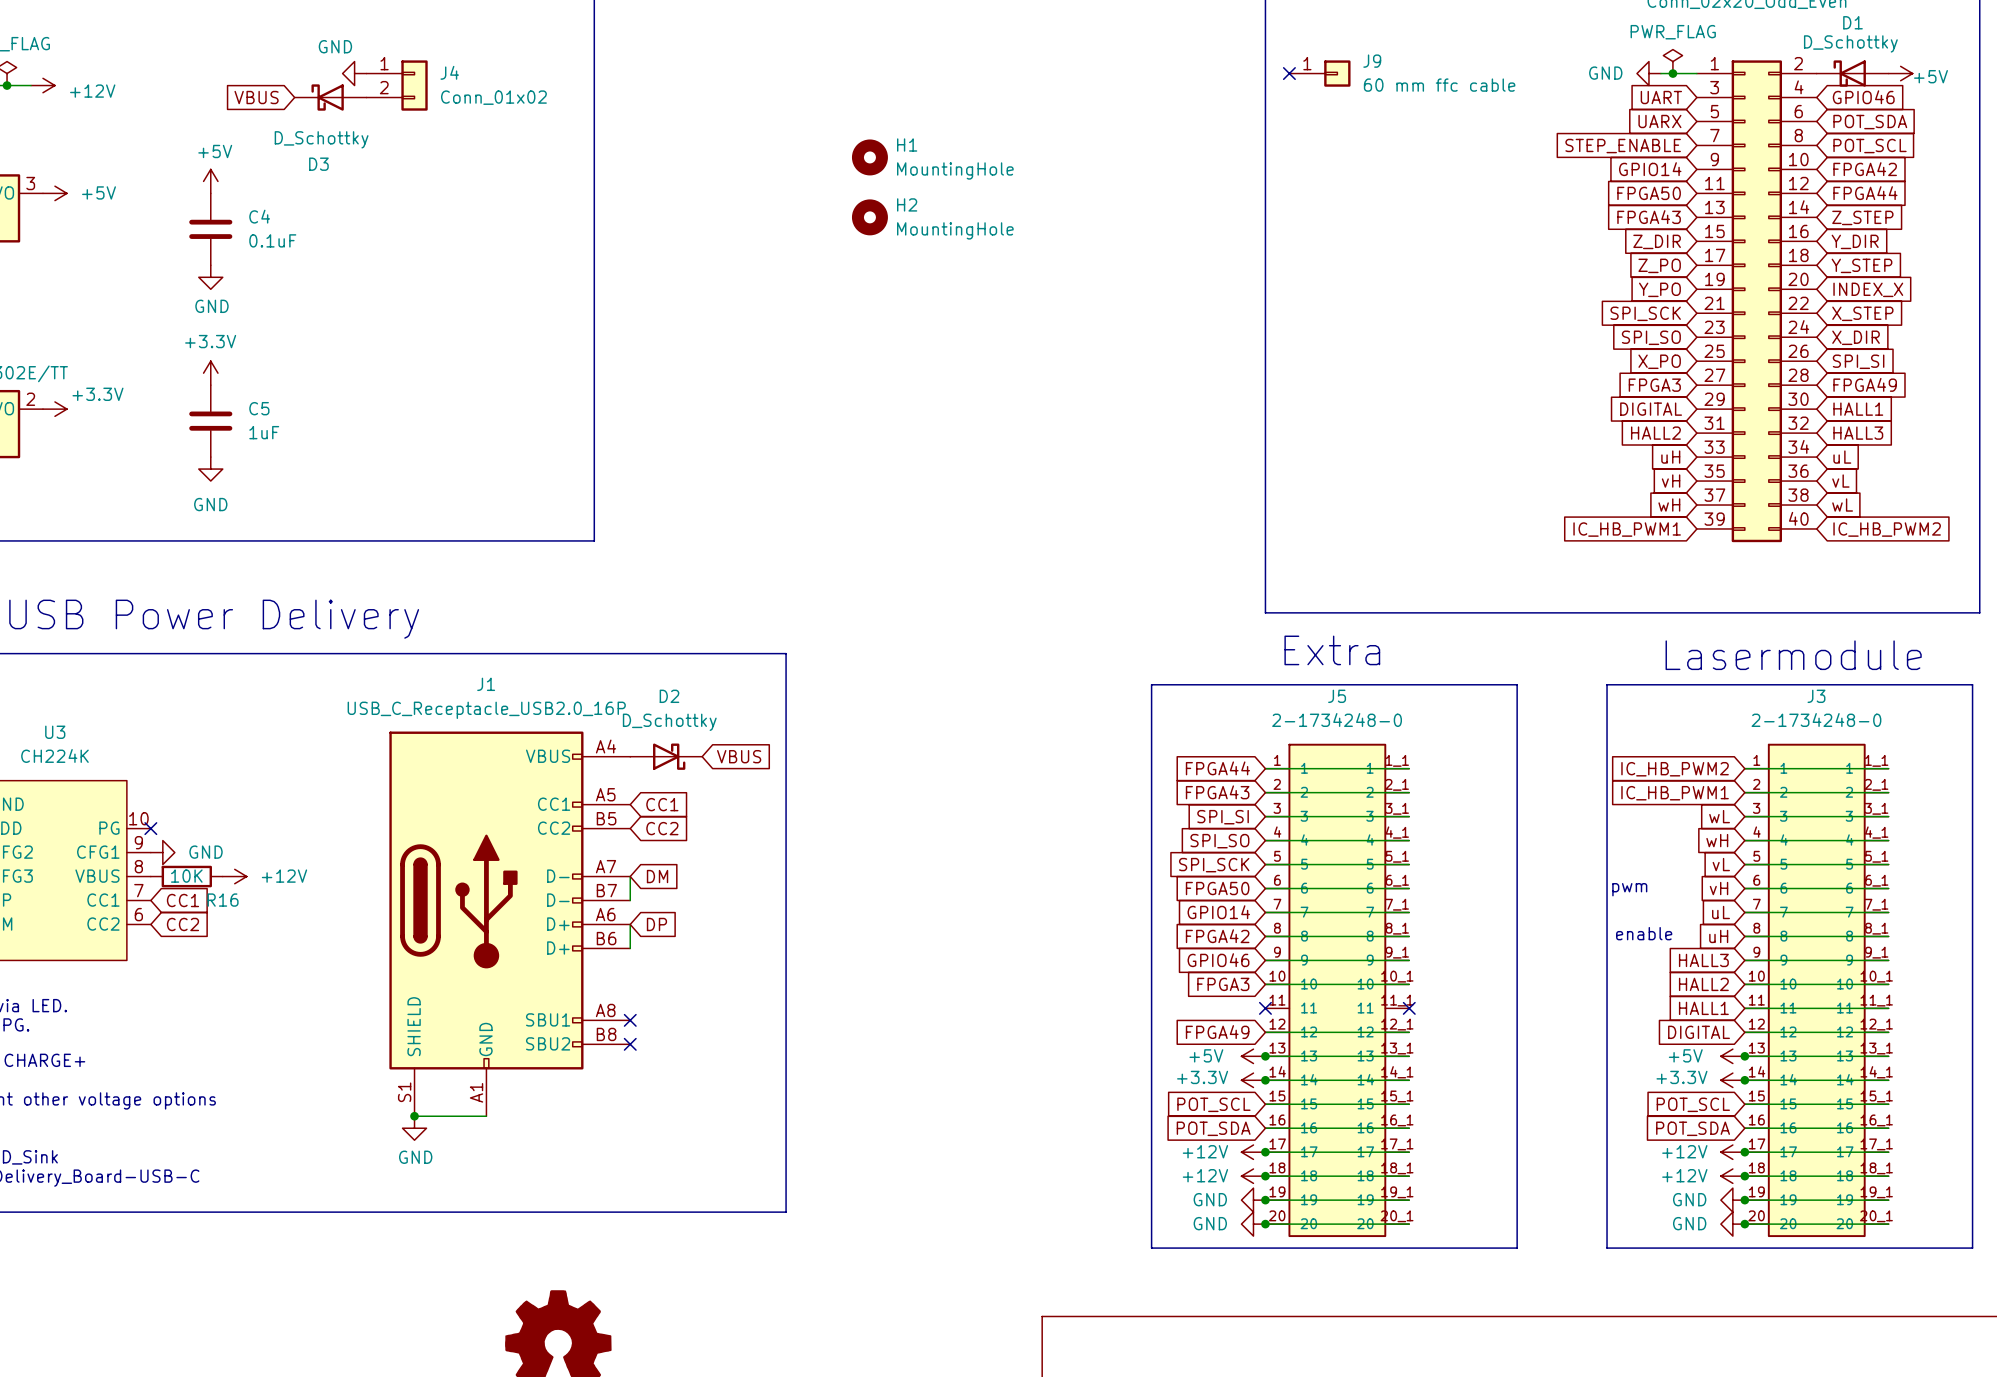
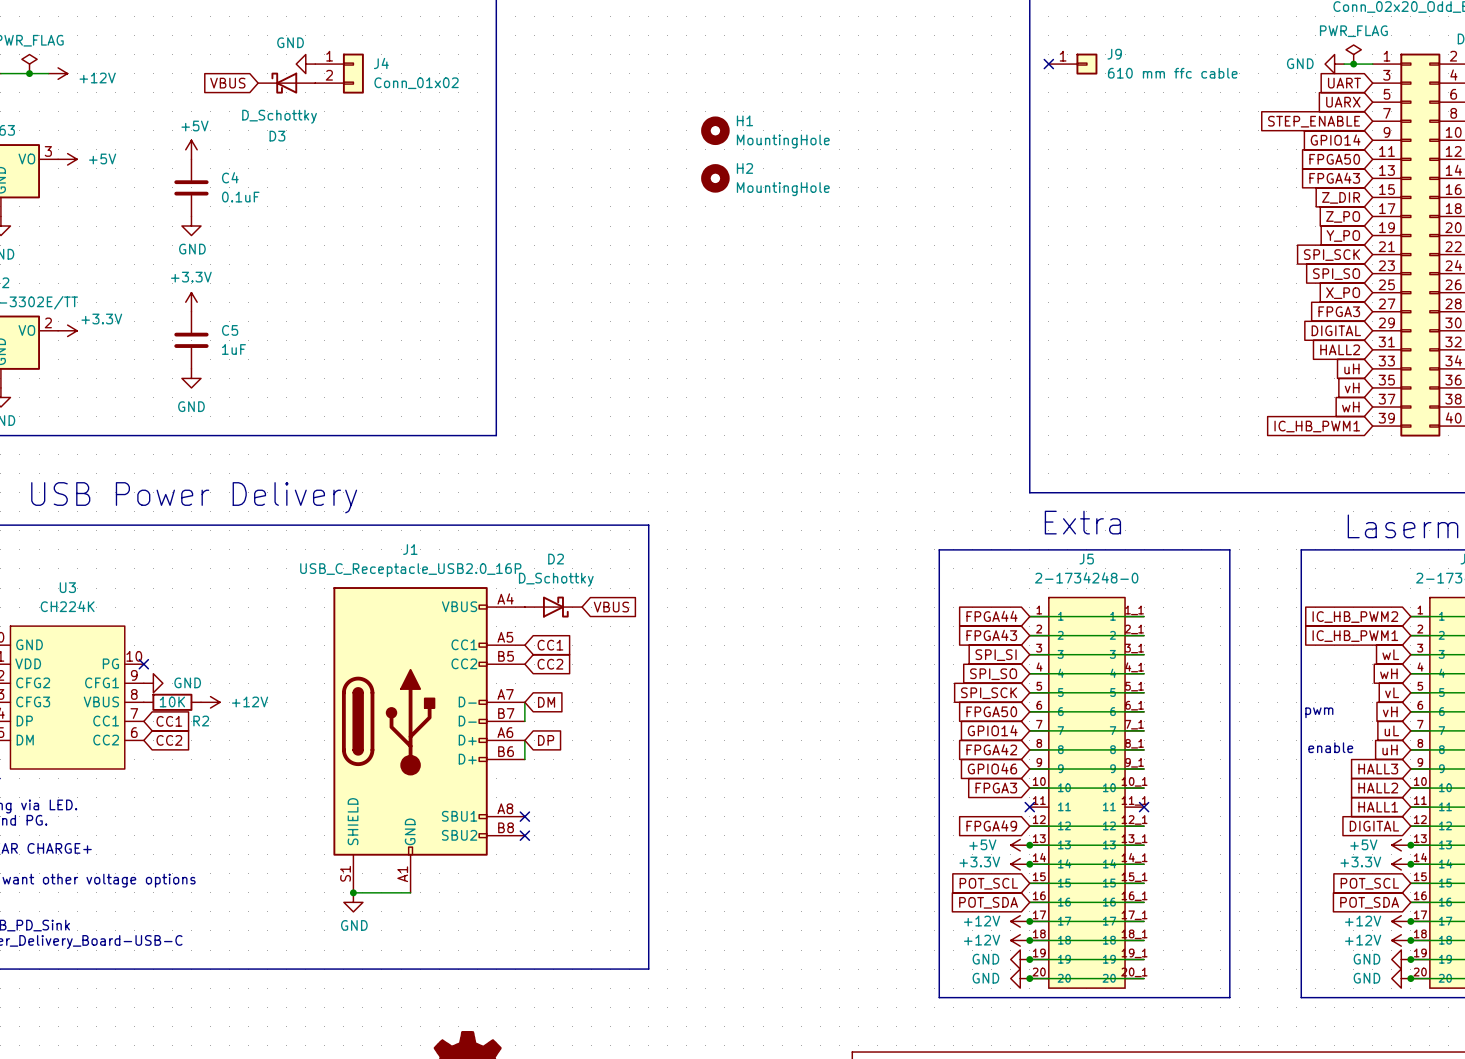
J9 value: 60 mm ffc cable (1439, 85) -> 610 mm ffc cable (1172, 73)
R16 name: R16 (223, 900) -> R2 (201, 721)

